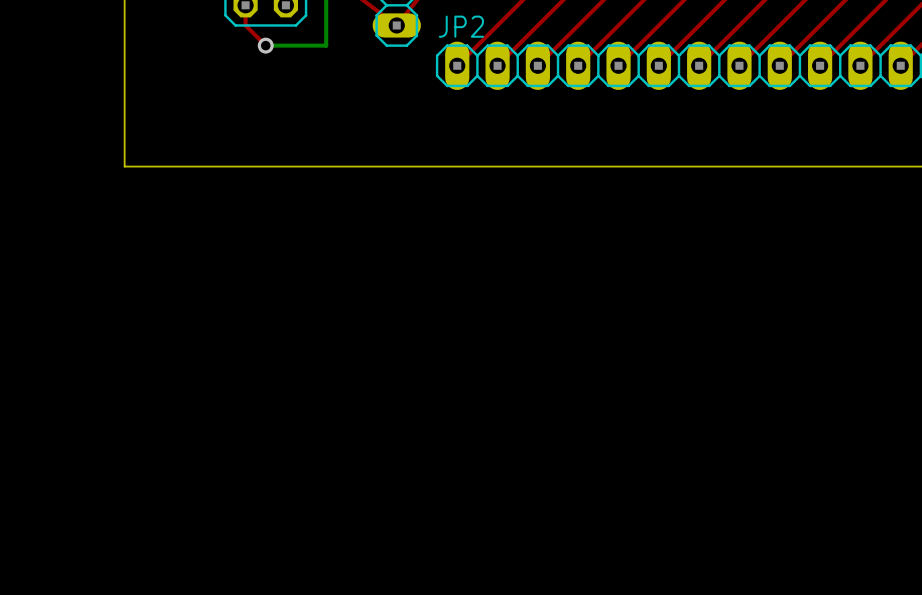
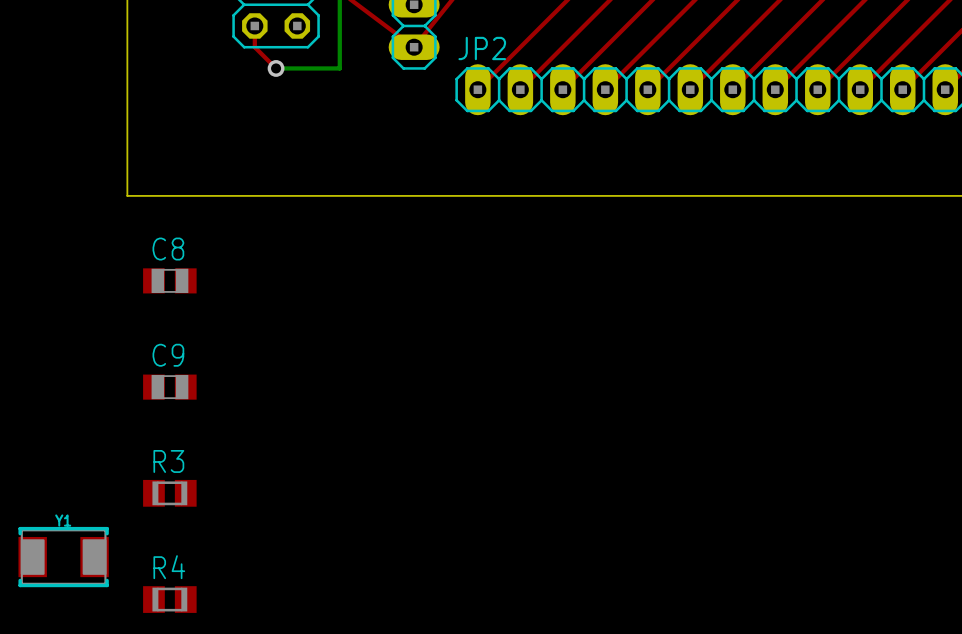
C8: none -> (169, 280)
C9: none -> (169, 387)
R3: none -> (169, 493)
Y1: none -> (63, 557)
R4: none -> (169, 599)

